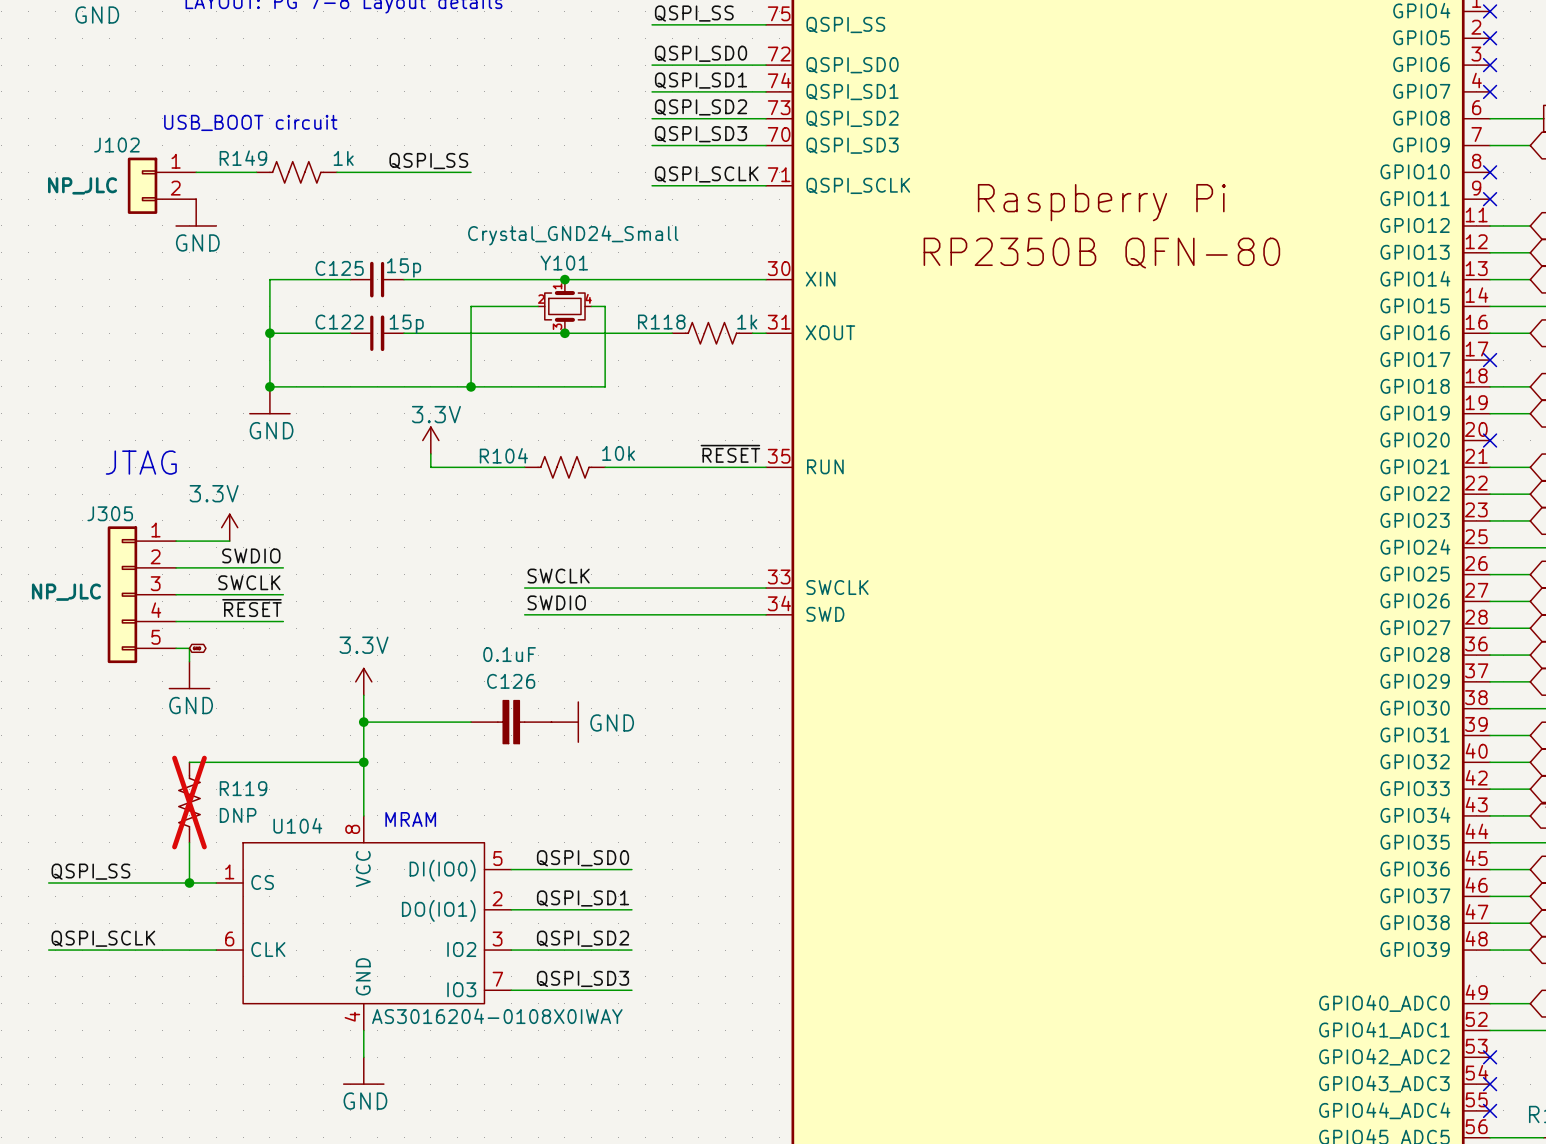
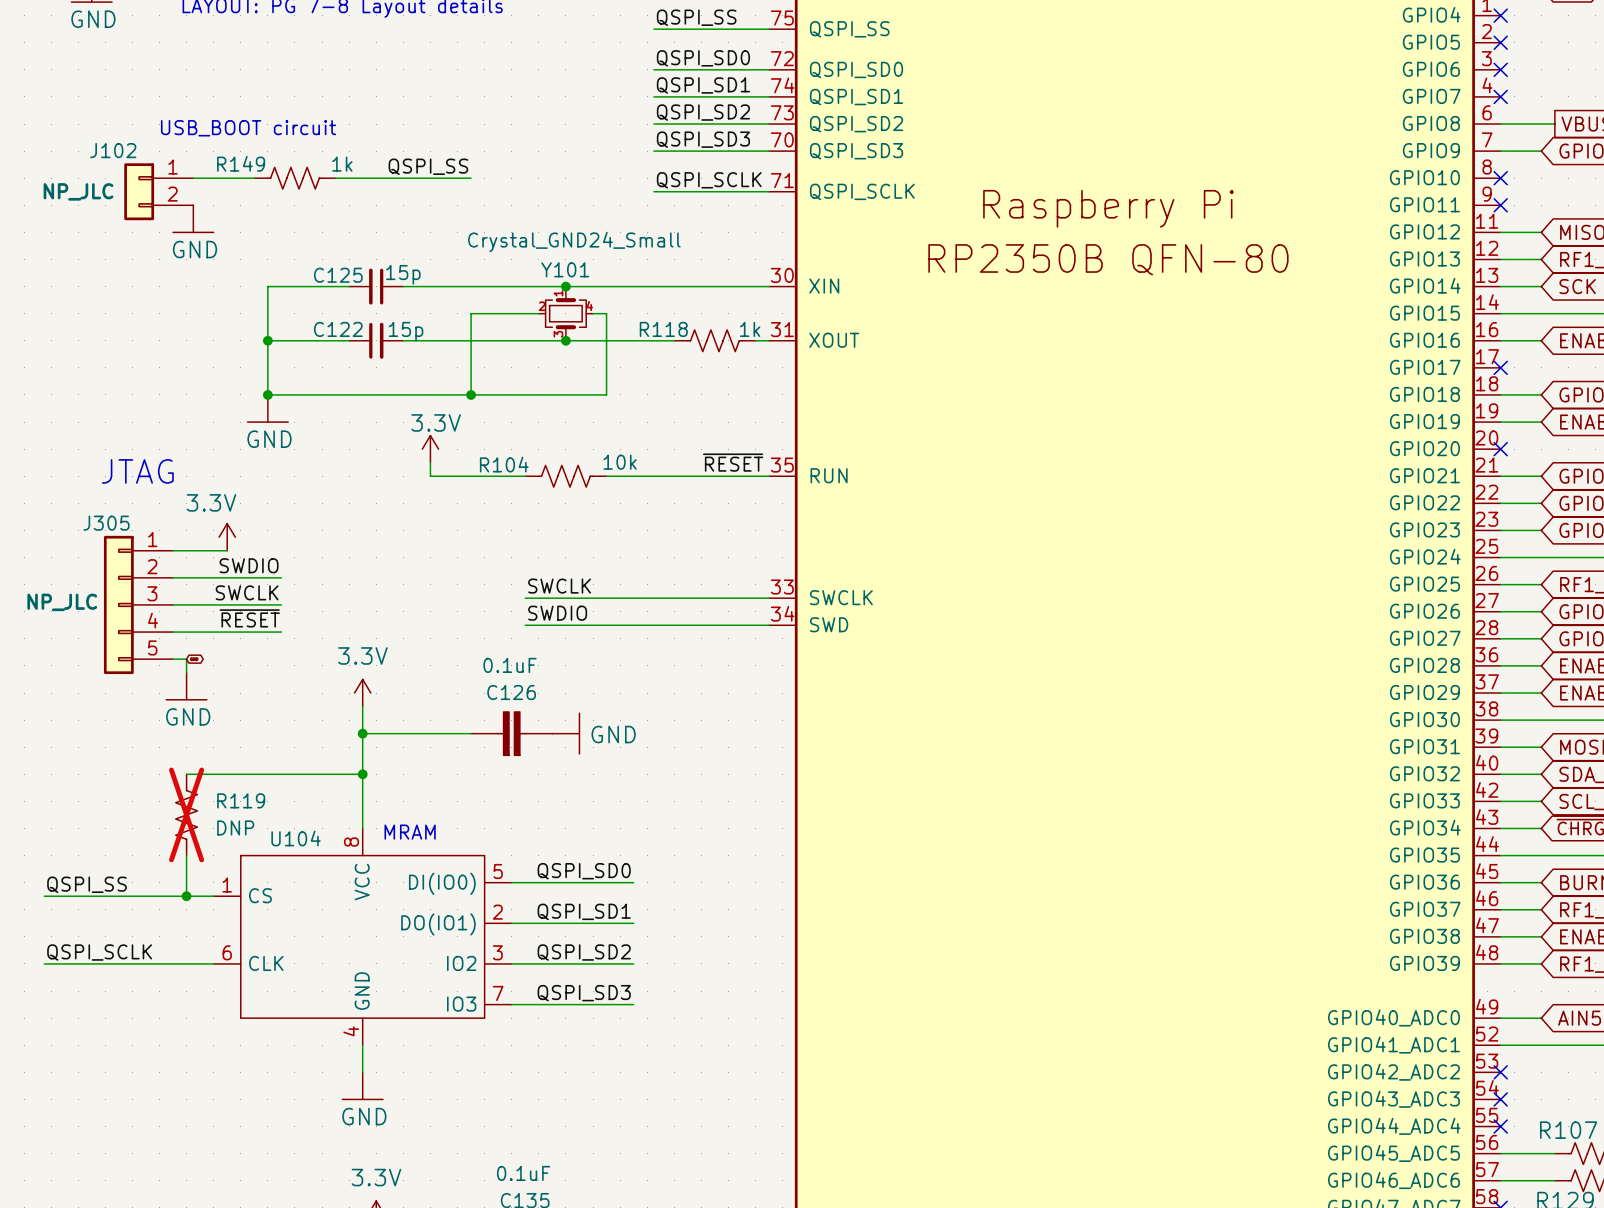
U104 value: AS3016204-0108X0IWAY (497, 1016) -> none

